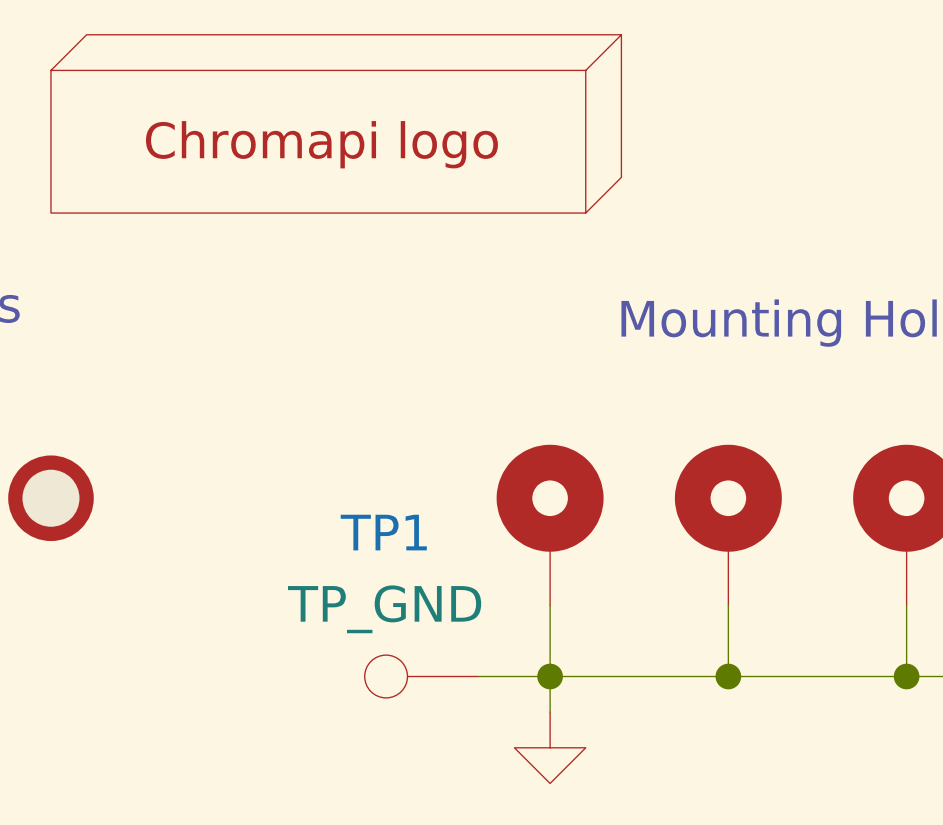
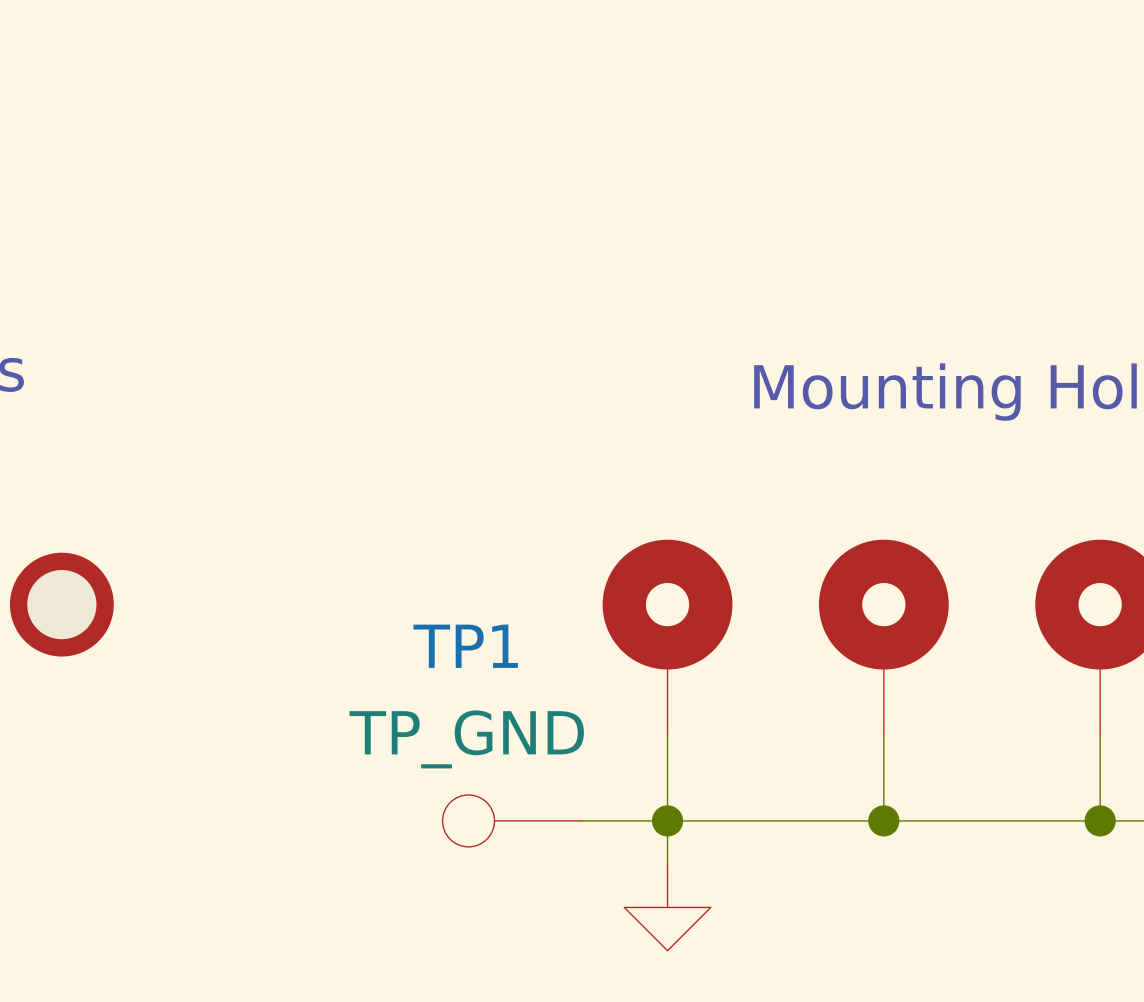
part: (336, 123) -> none

